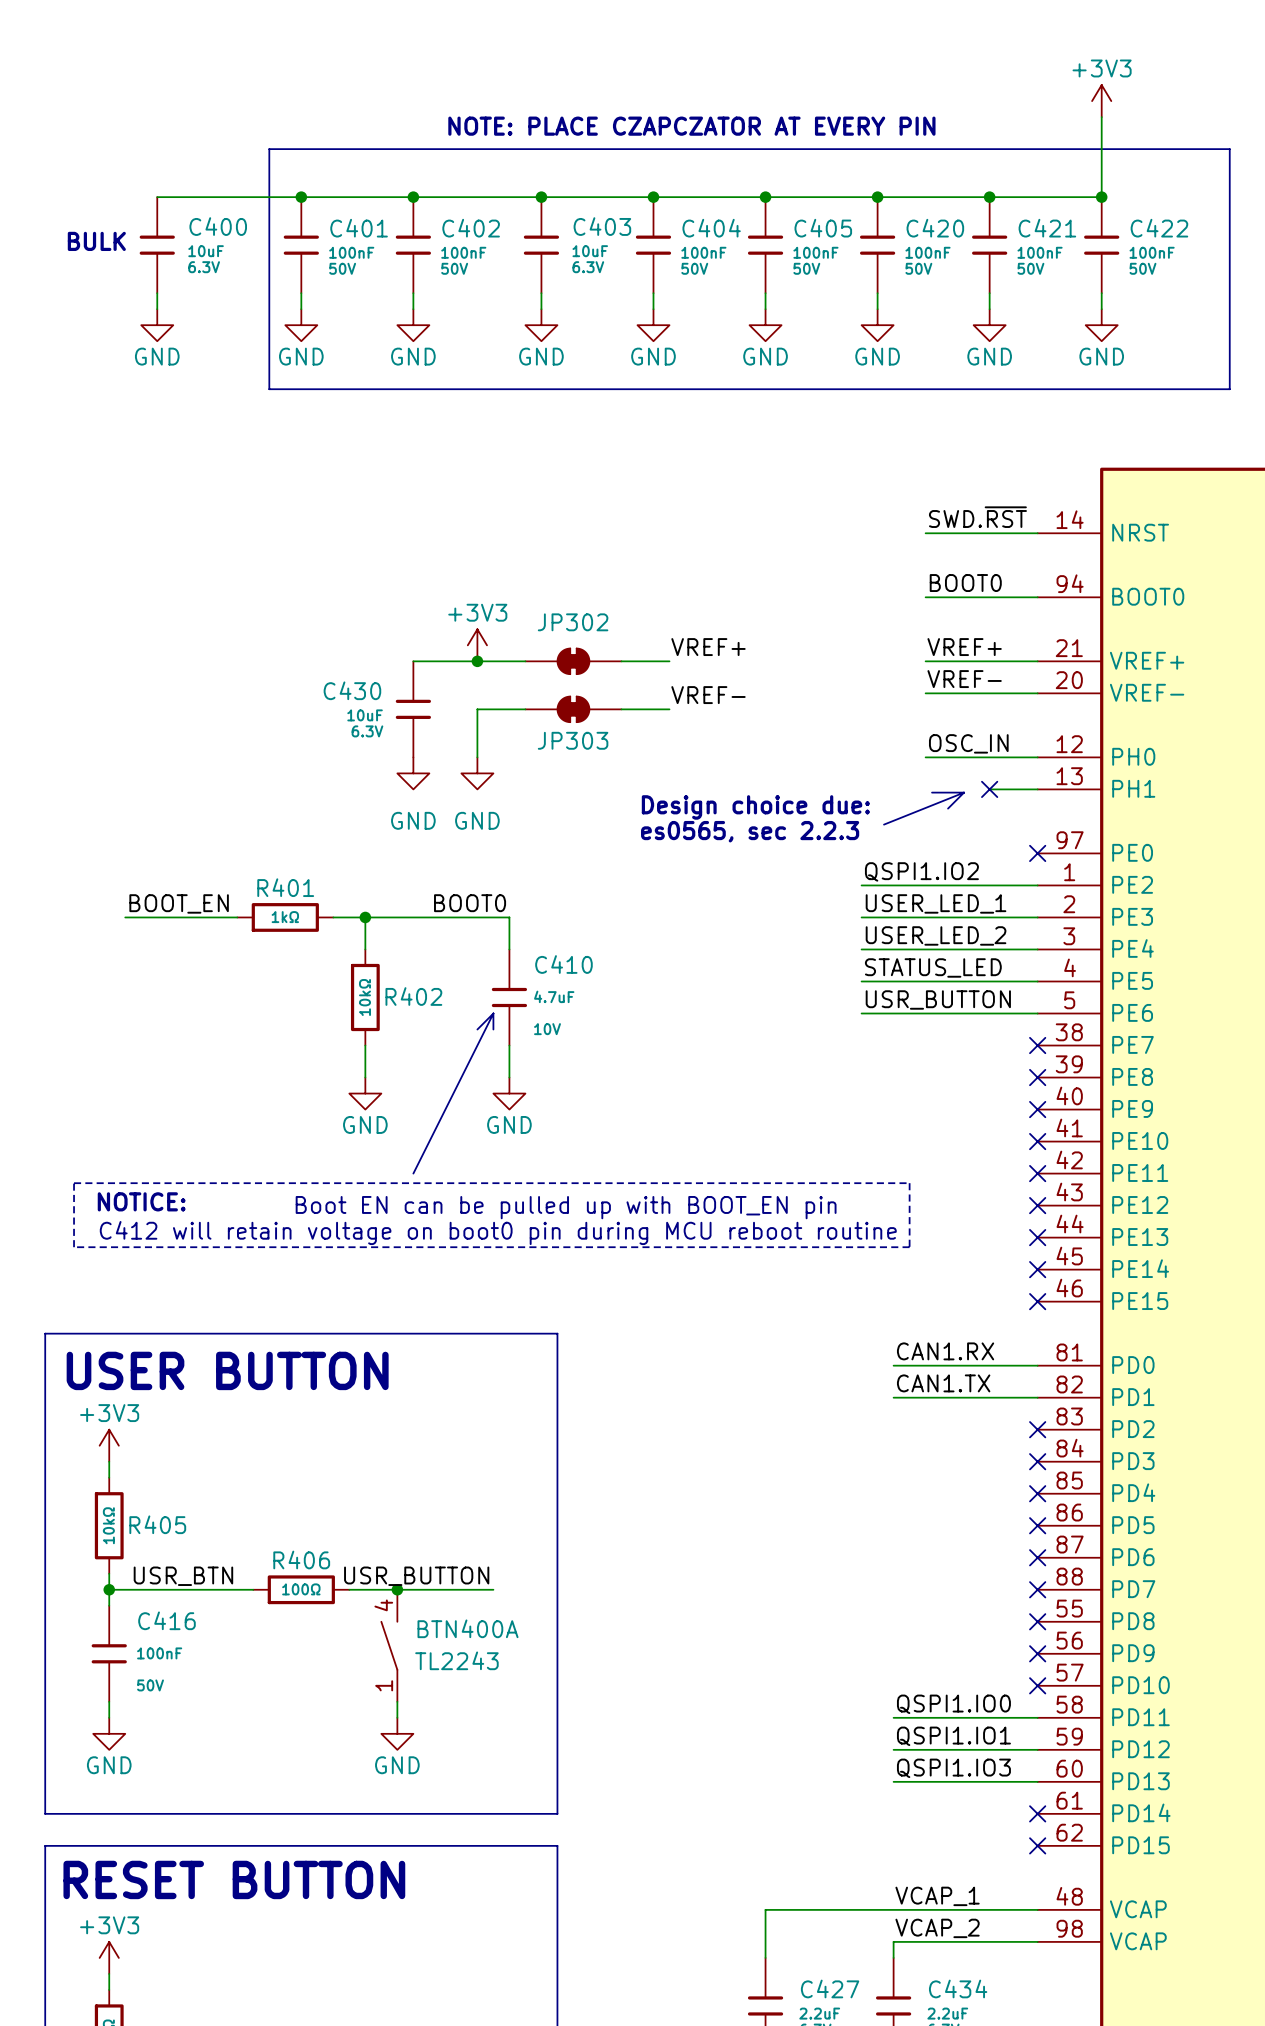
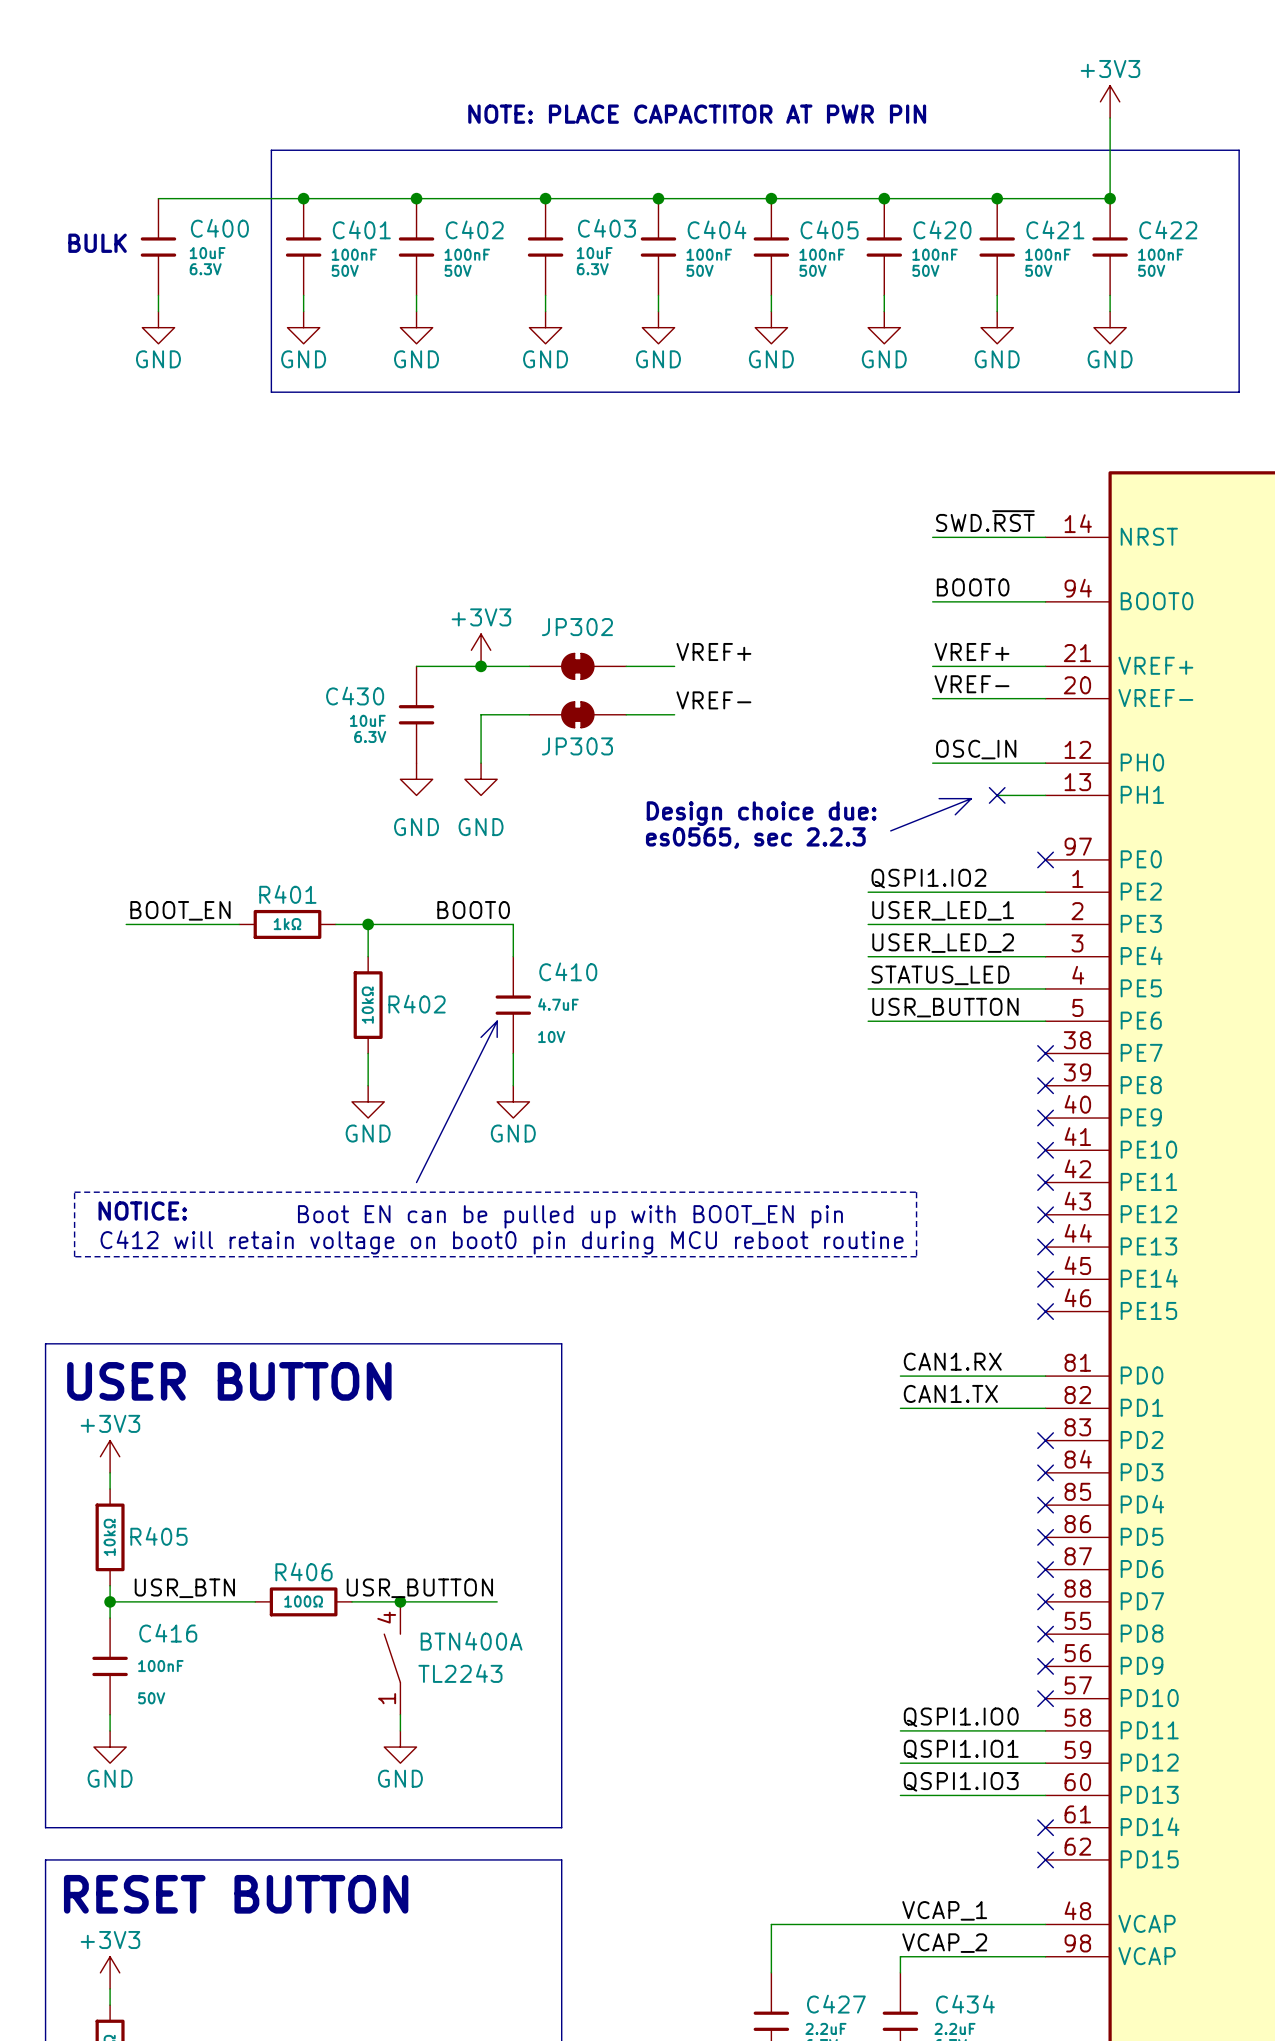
text: NOTE: PLACE CZAPCZATOR AT EVERY PIN (691, 126) -> NOTE: PLACE CAPACTITOR AT PWR PIN (697, 114)

